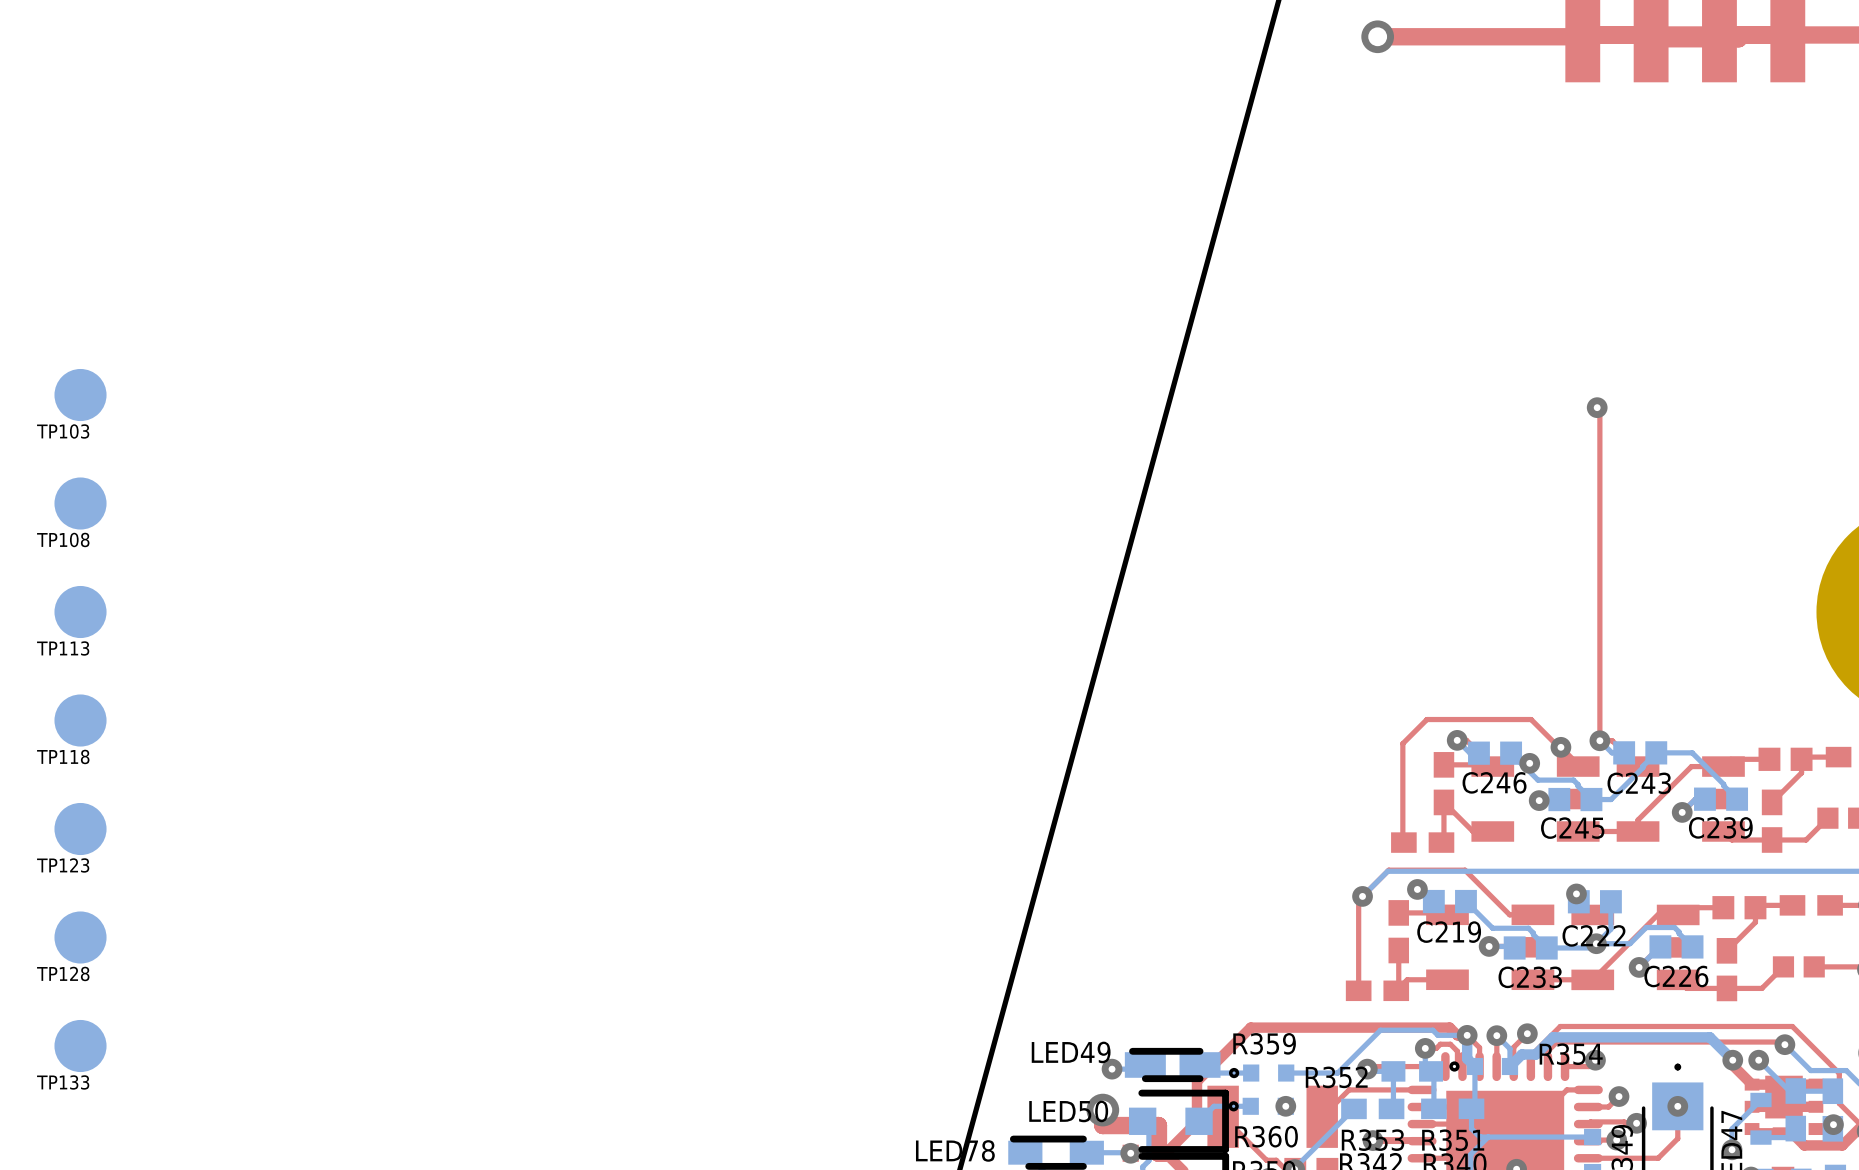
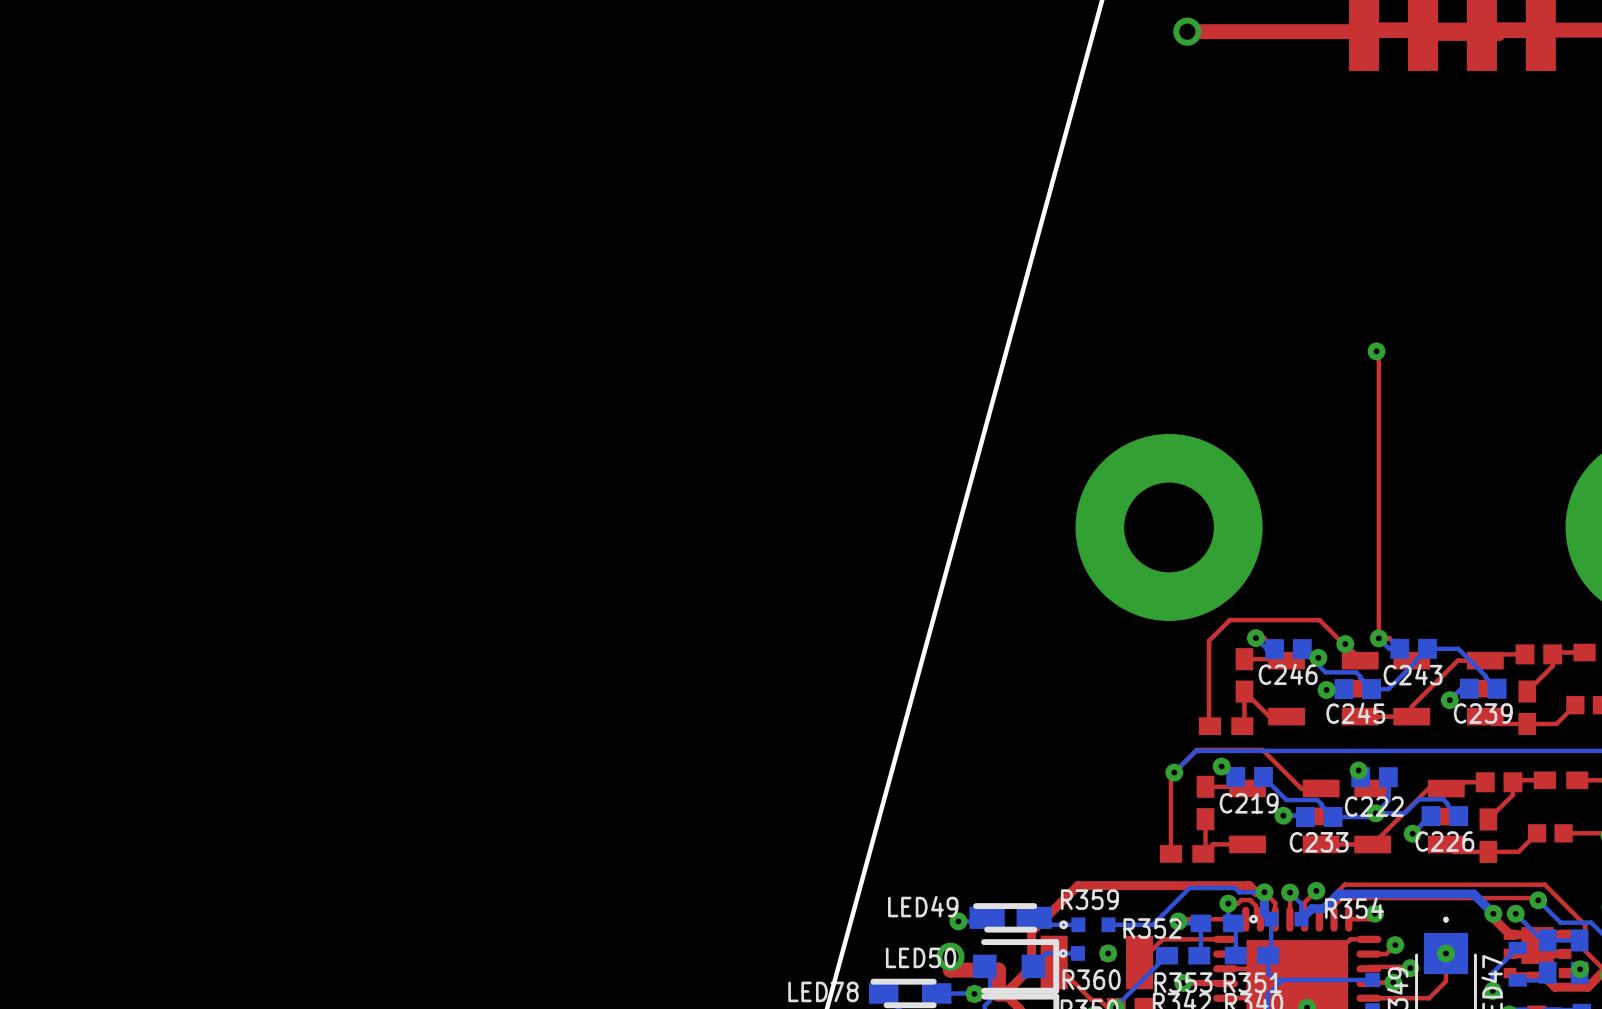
TP103: (80, 395) -> none
TP108: (80, 503) -> none
TP113: (80, 612) -> none
part: none -> (1169, 527)
TP118: (80, 720) -> none
TP123: (80, 829) -> none
TP128: (80, 937) -> none
TP133: (80, 1046) -> none

